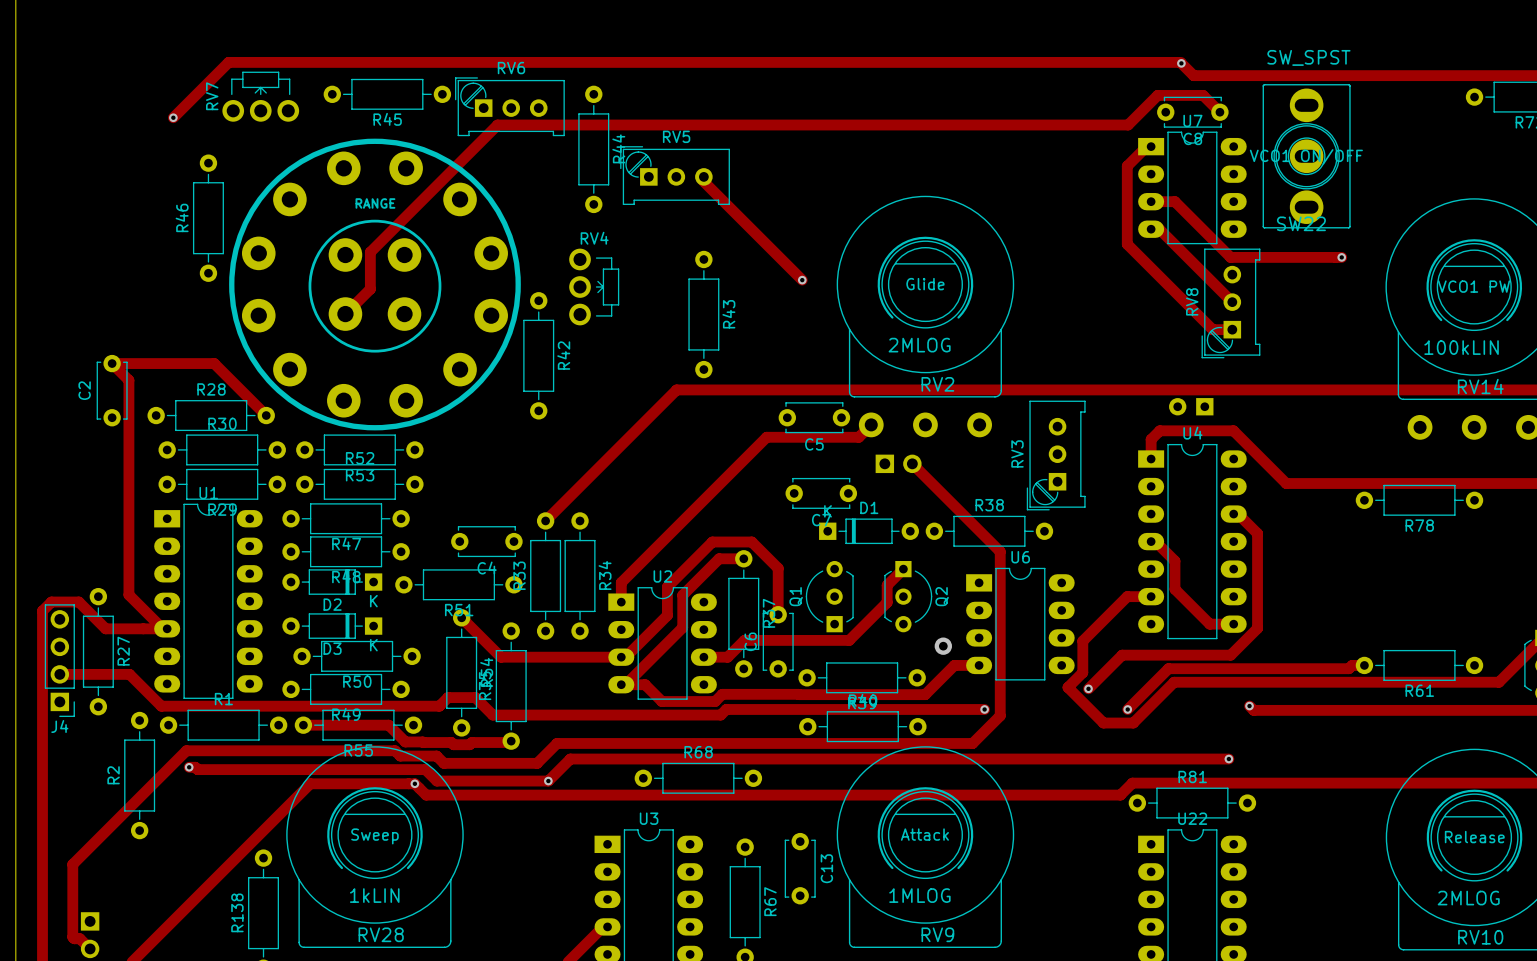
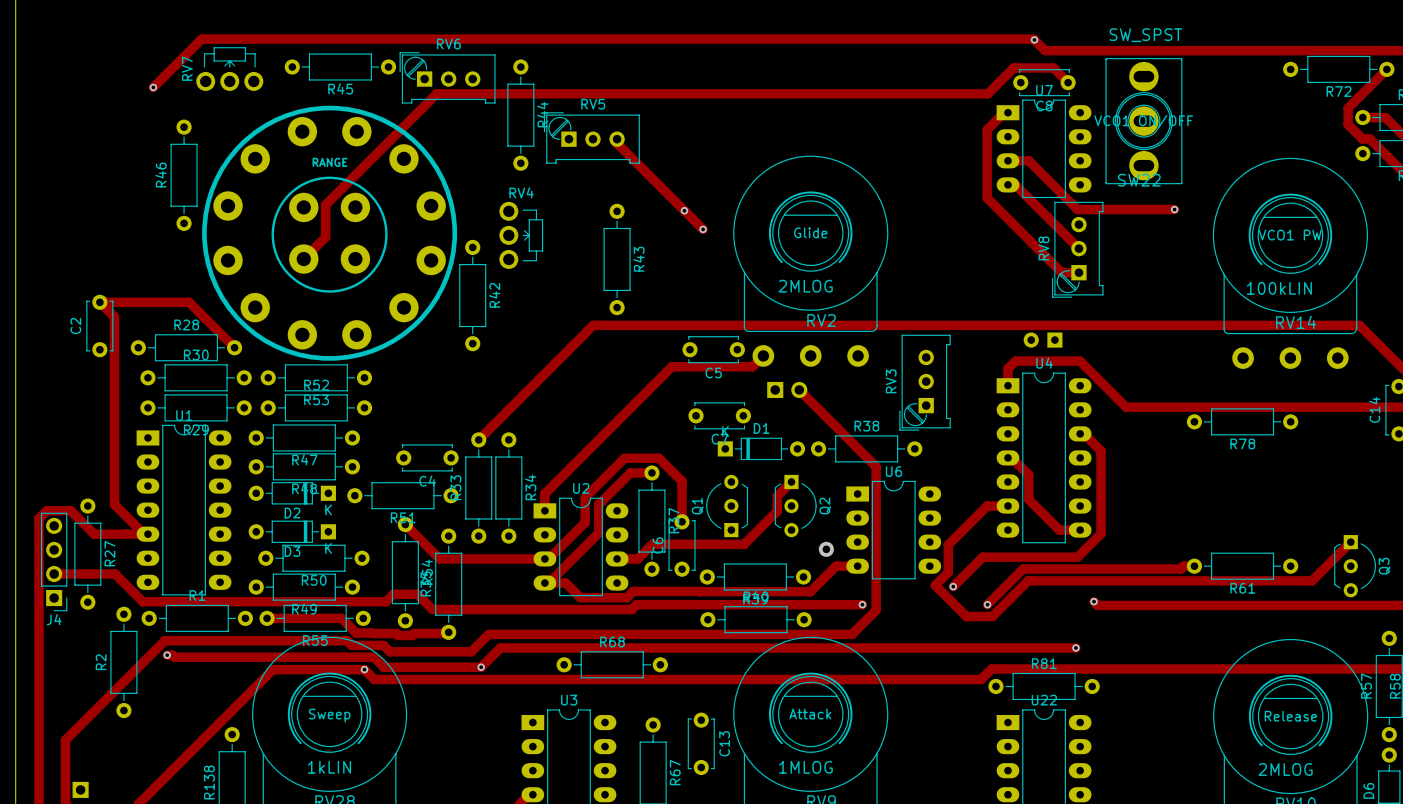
via: none -> (684, 210)

